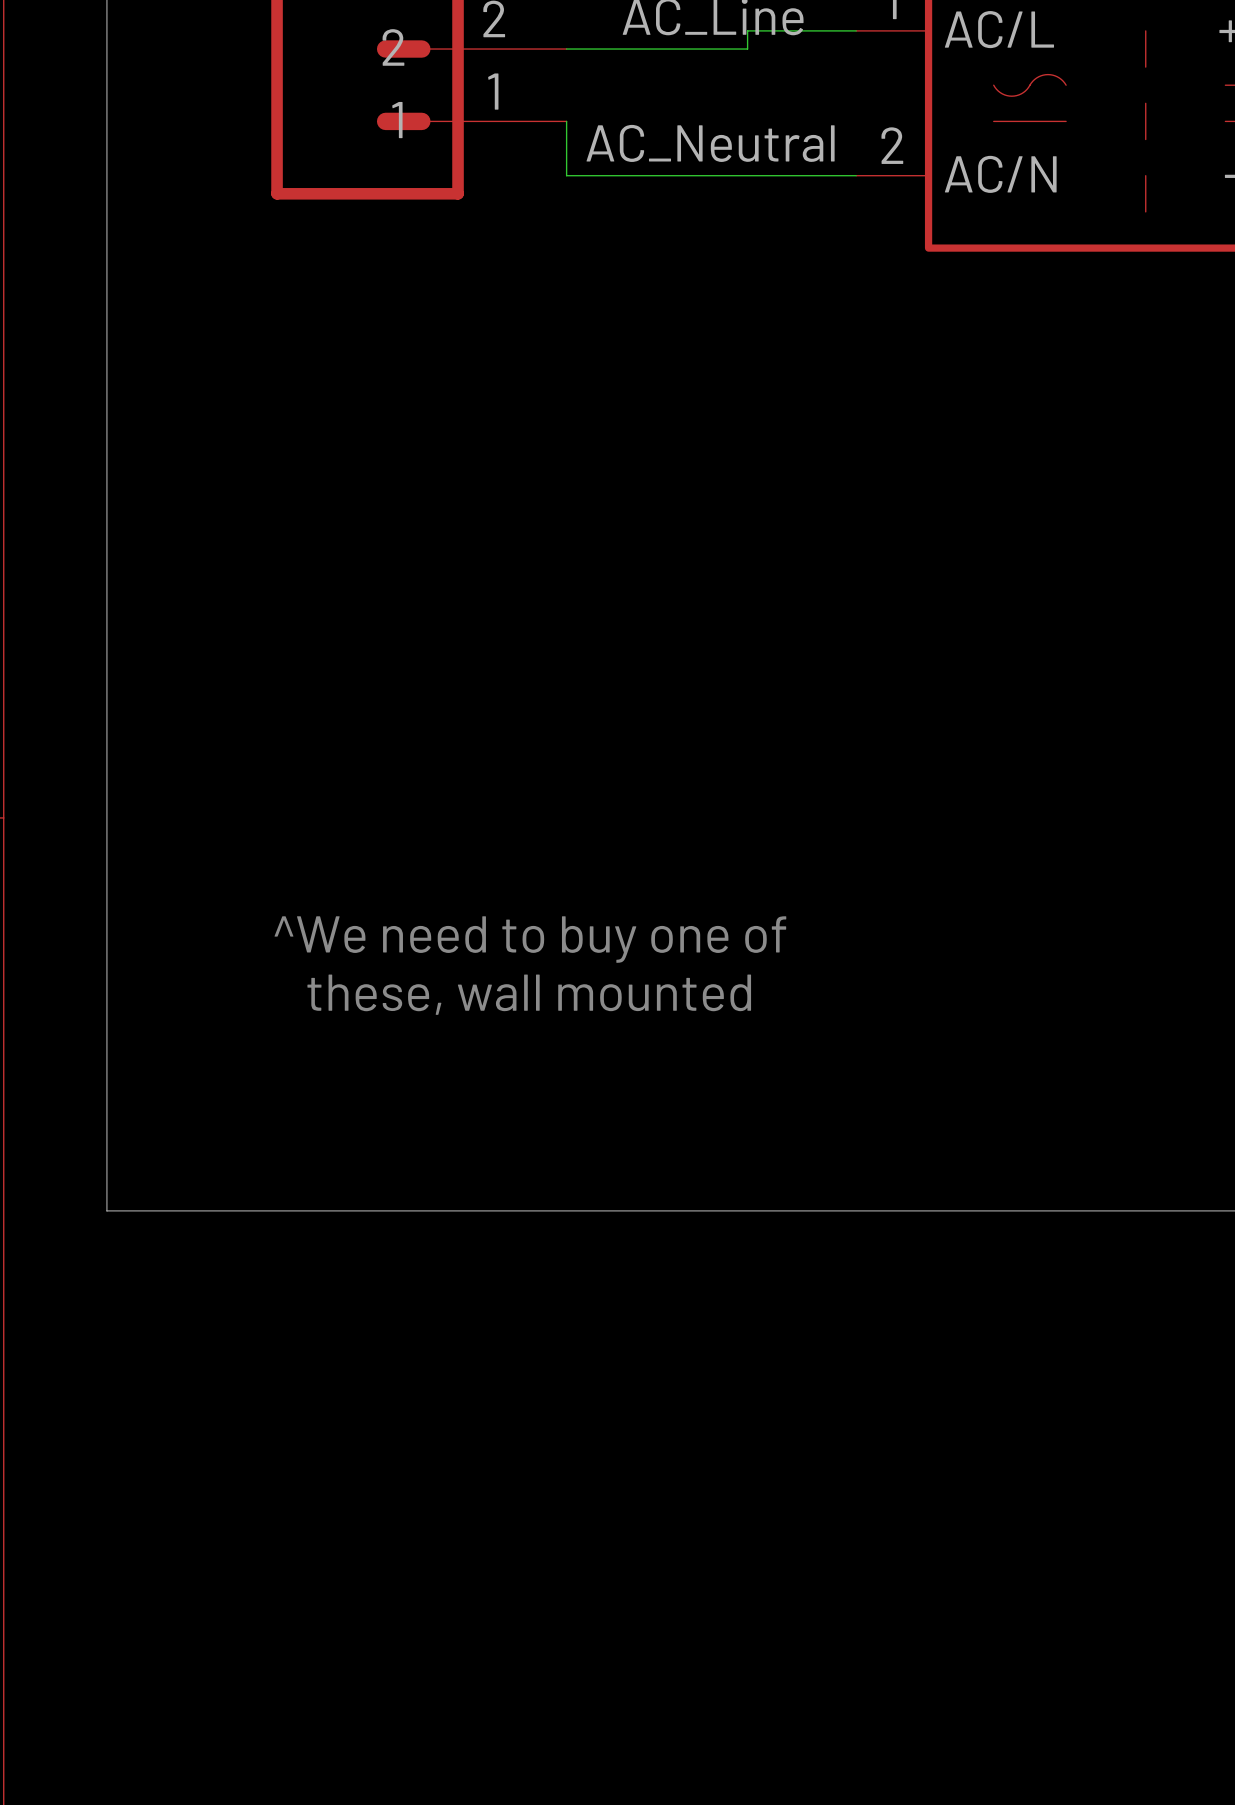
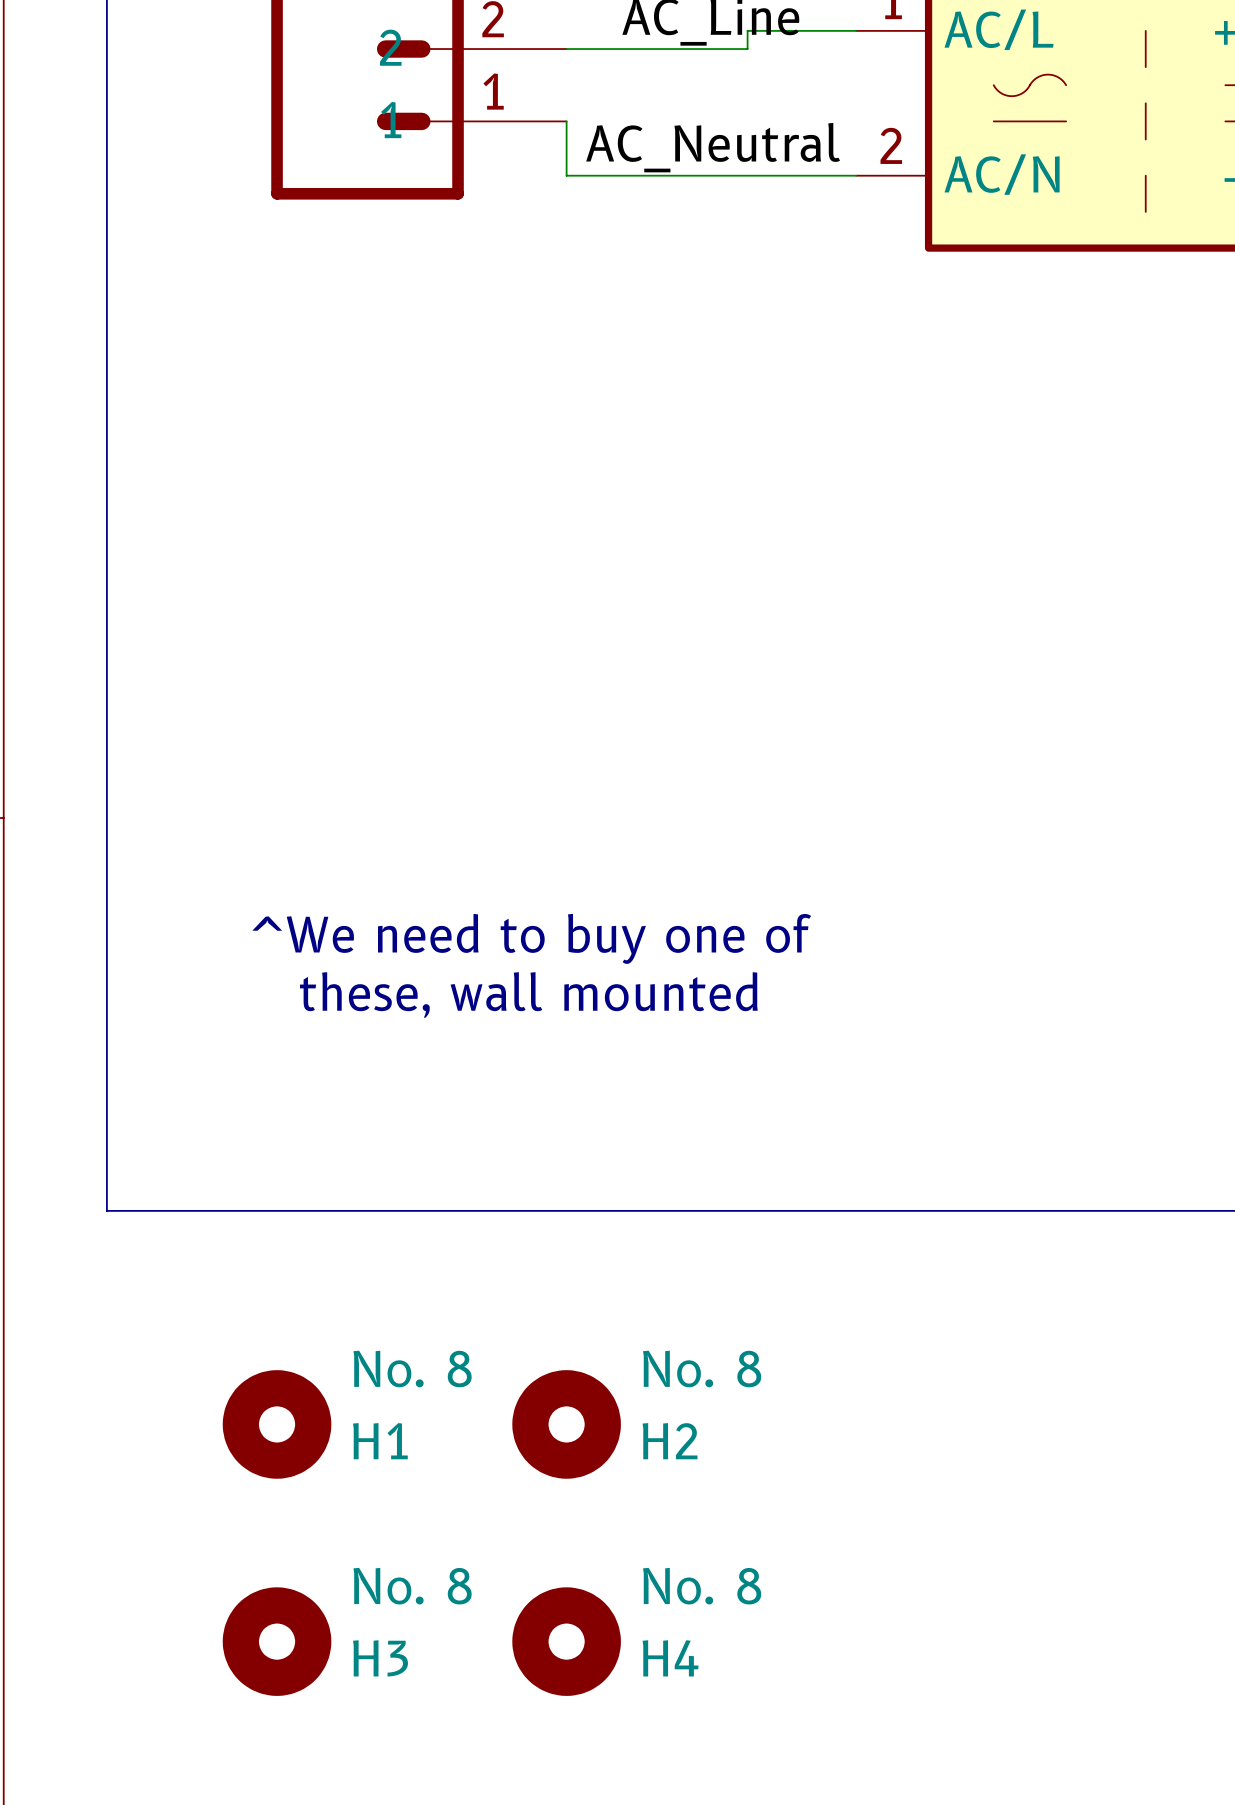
H1: none -> No. 8 (277, 1424)
H2: none -> No. 8 (566, 1424)
H3: none -> No. 8 (277, 1641)
H4: none -> No. 8 (566, 1641)

